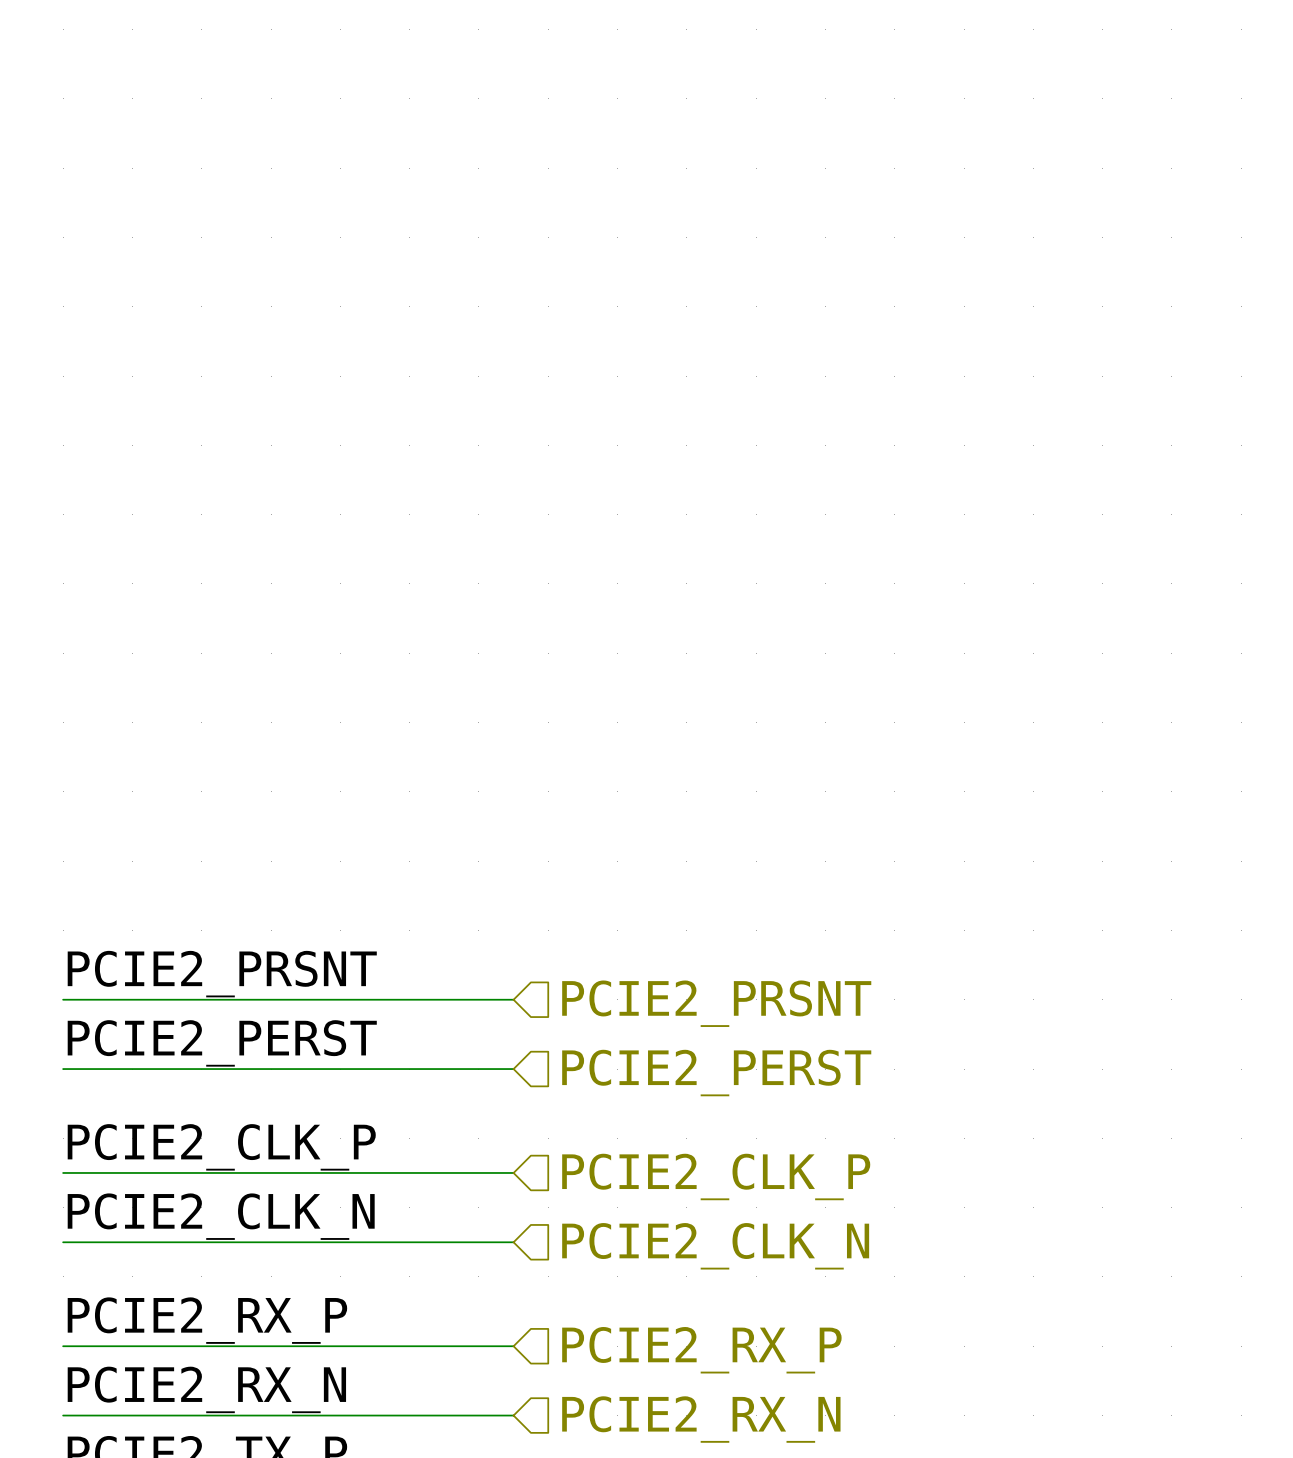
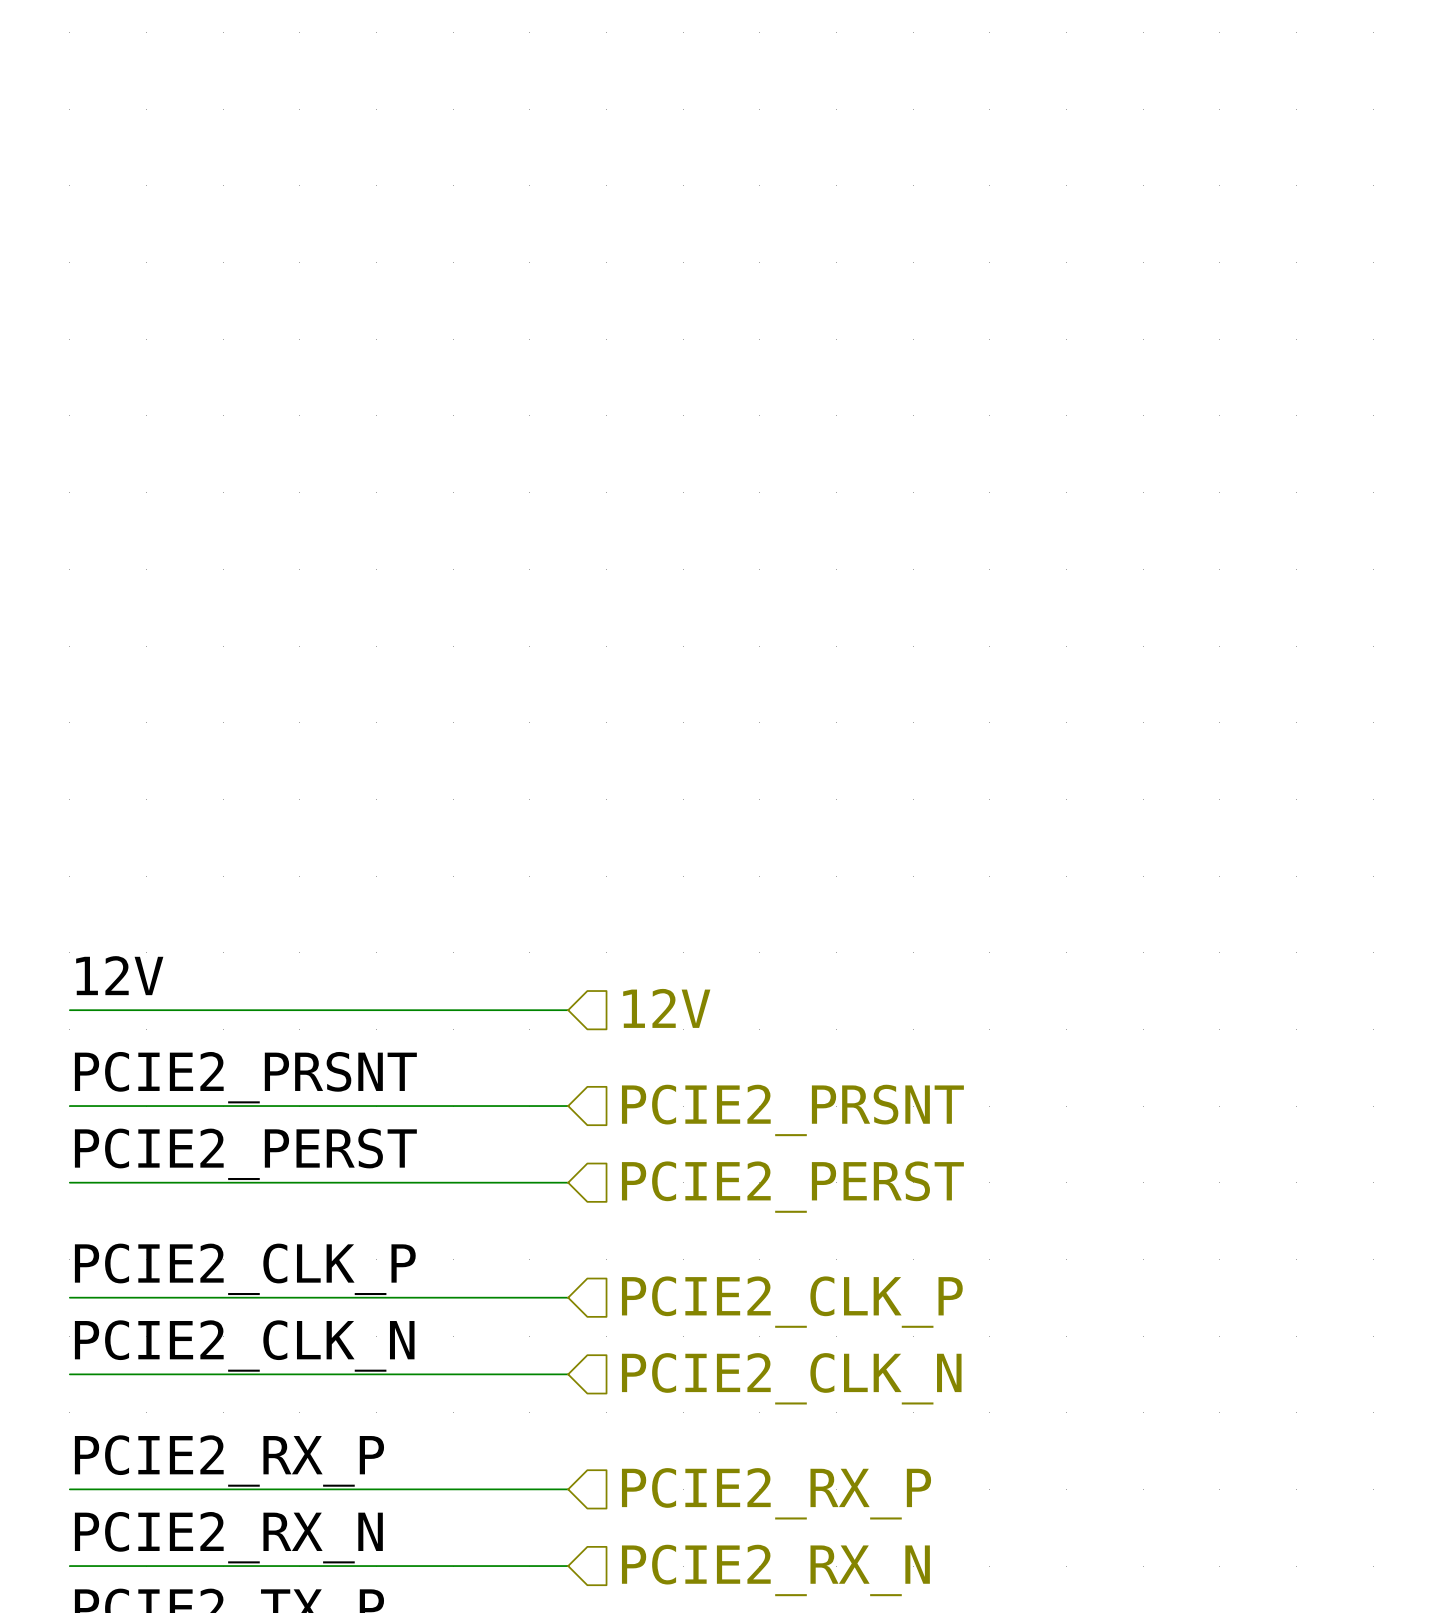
label: none -> 12V (119, 975)
hierarchical label: none -> 12V (666, 1008)
wire: none -> (69, 1010) (568, 1010)

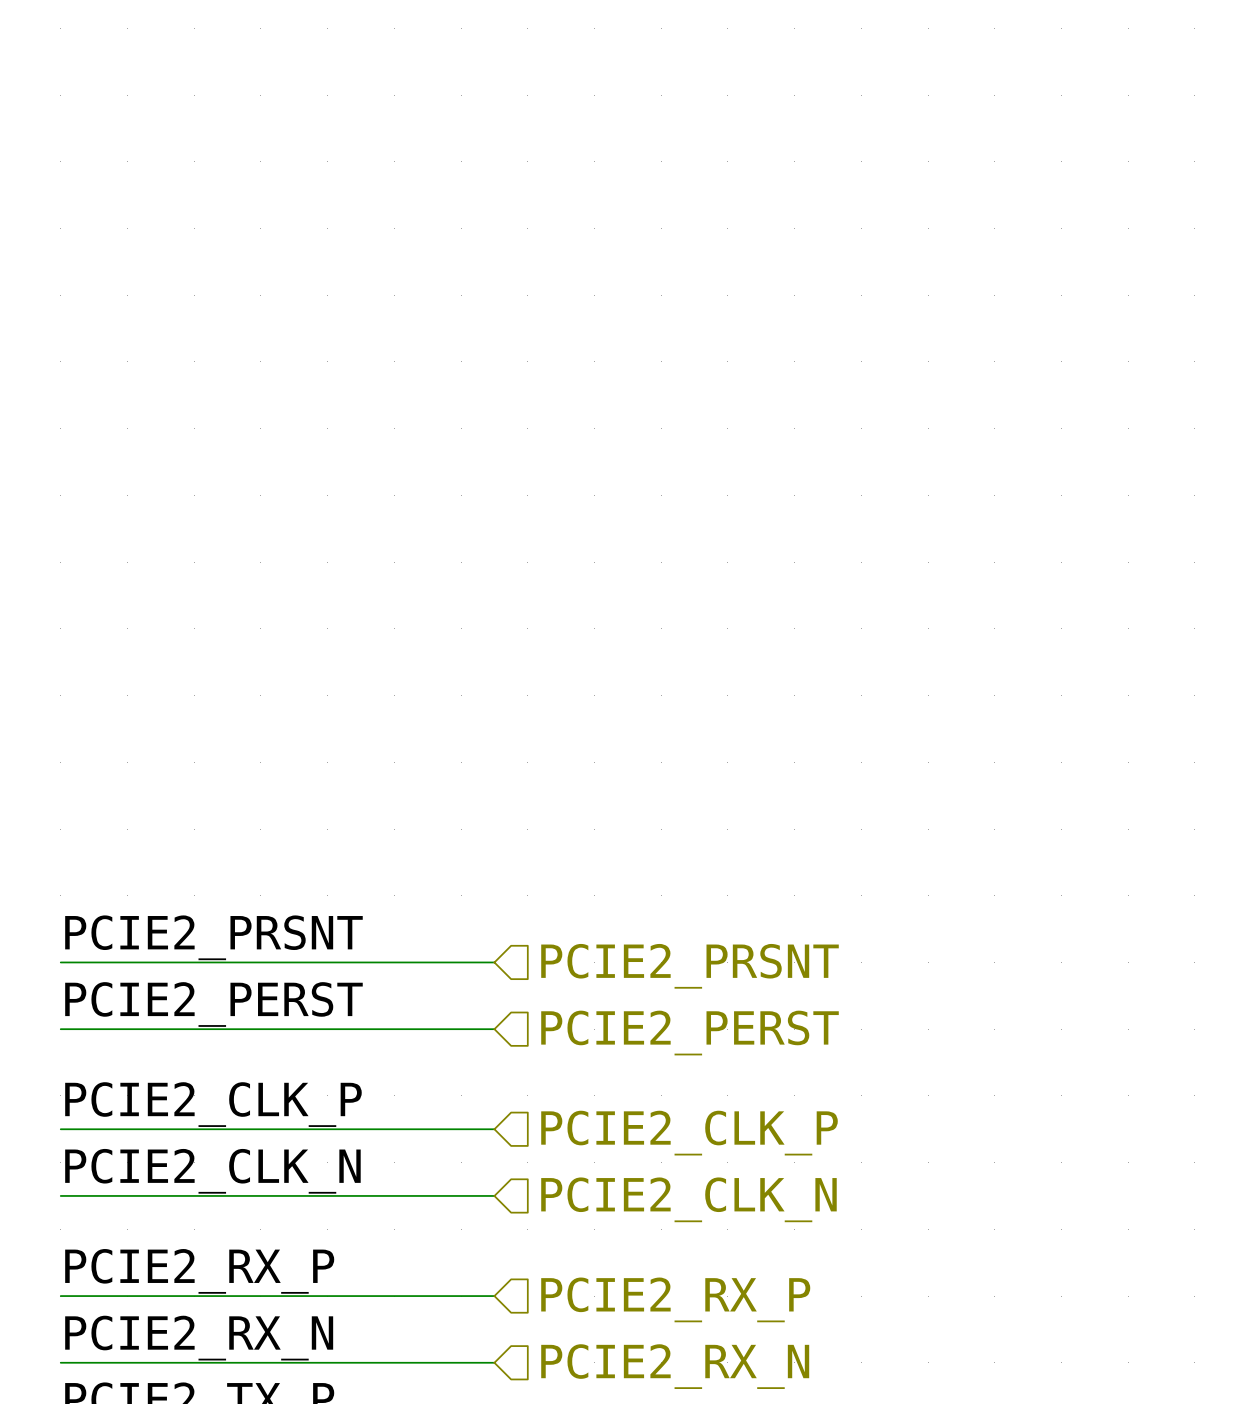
label: 12V (119, 975) -> none
hierarchical label: 12V (666, 1008) -> none
wire: (69, 1010) (568, 1010) -> none

